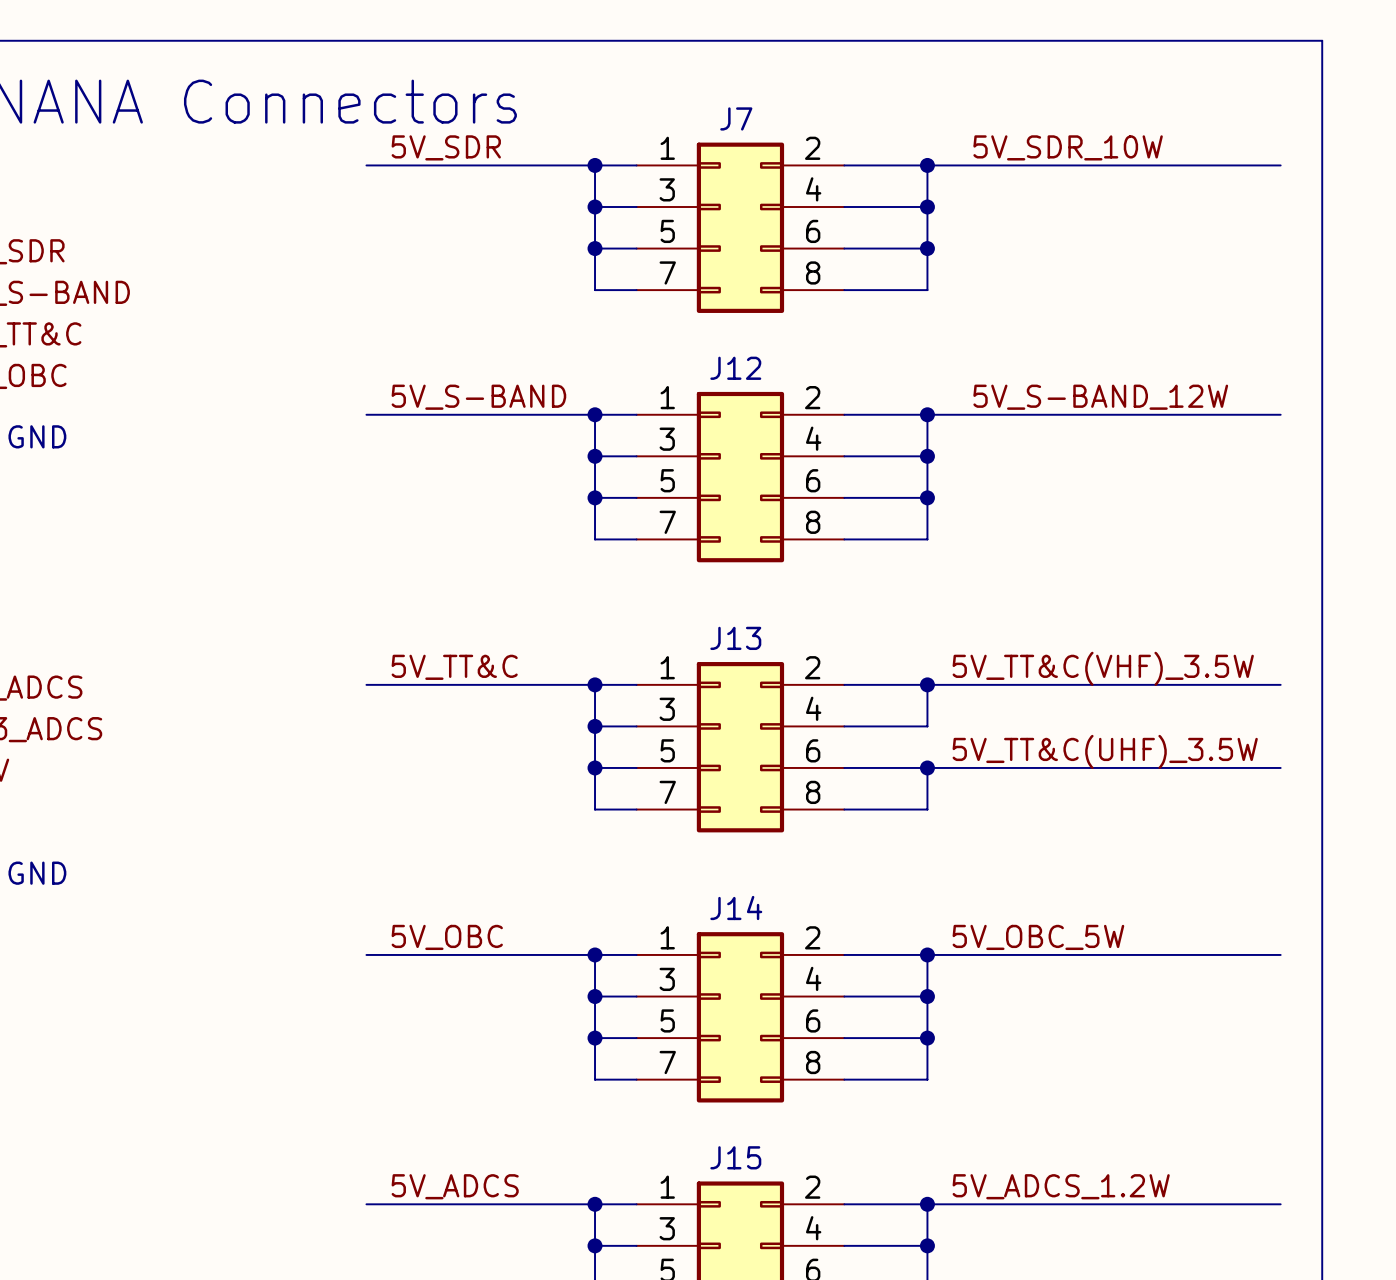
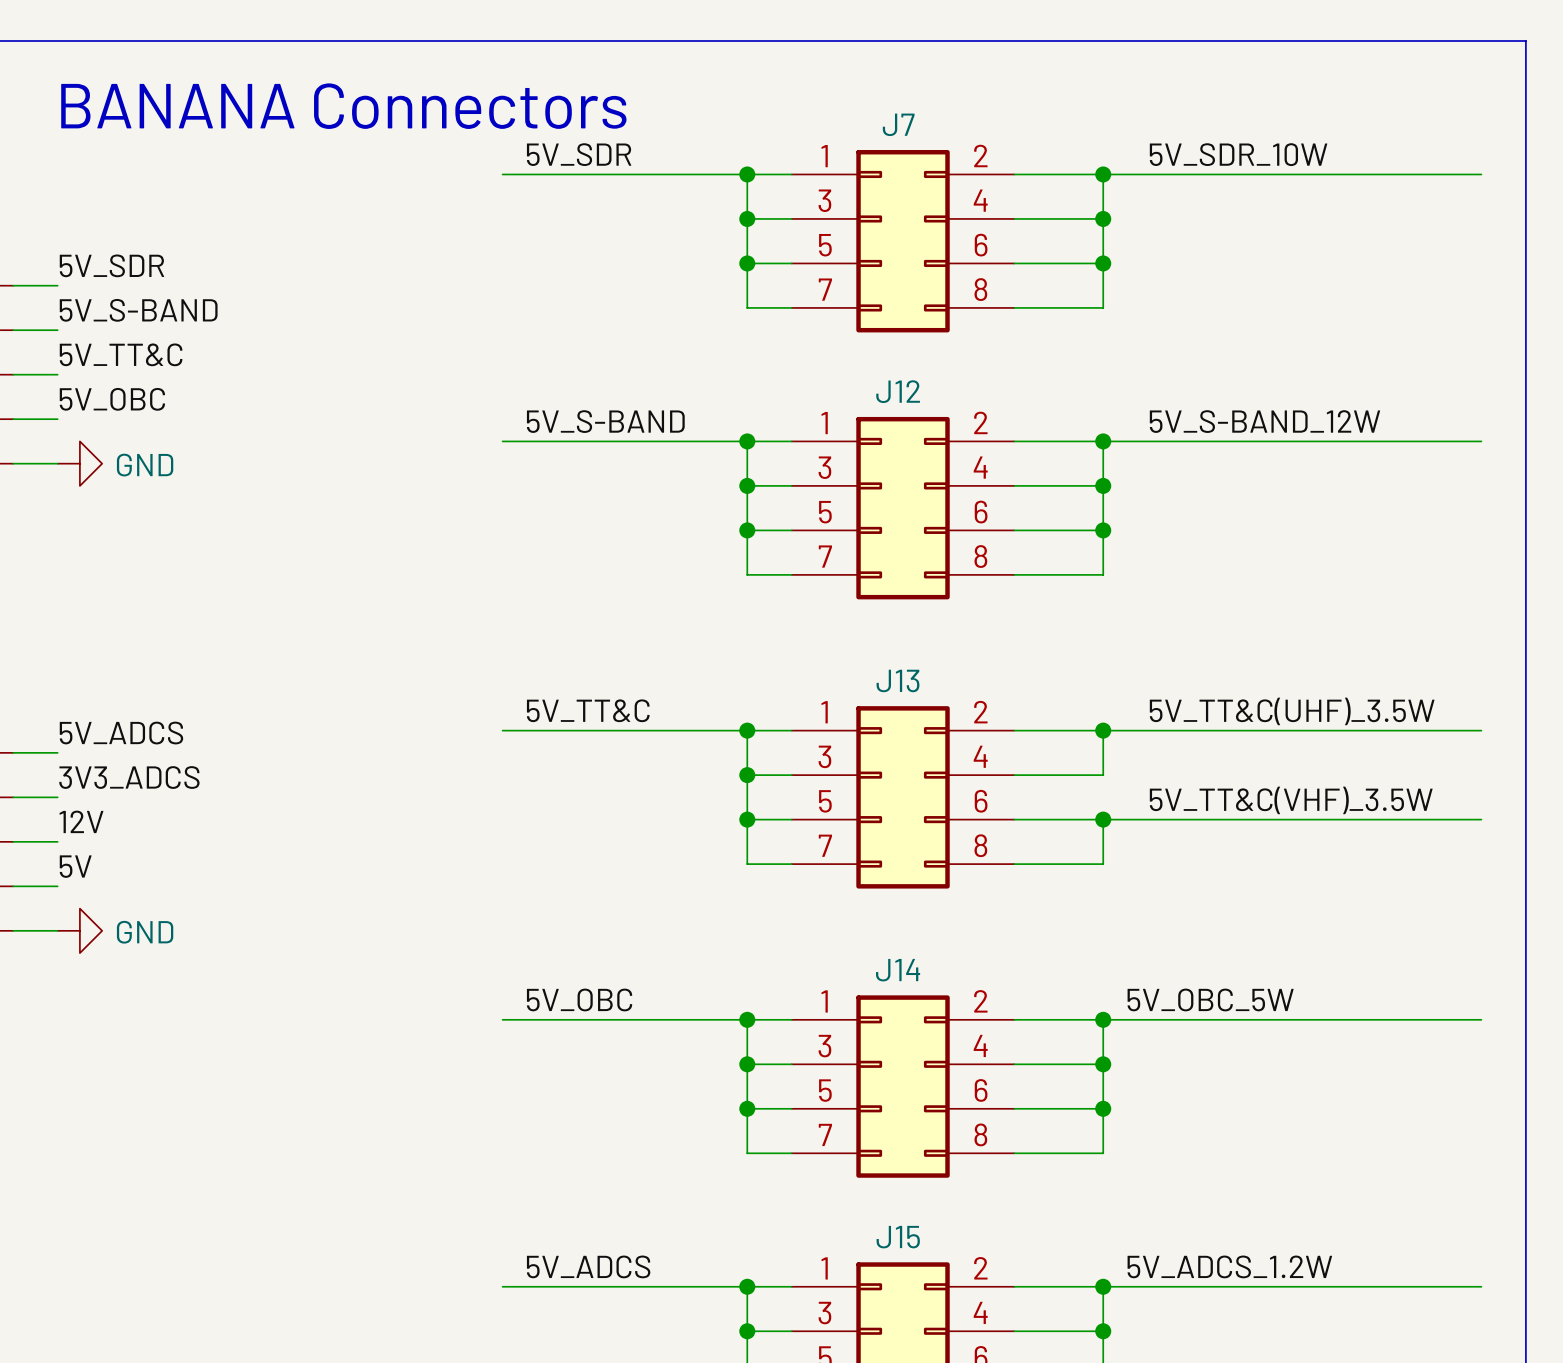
label position: 5V_TT&C(VHF)_3.5W (1103, 668) -> 5V_TT&C(VHF)_3.5W (1291, 800)
label position: 5V_TT&C(UHF)_3.5W (1105, 751) -> 5V_TT&C(UHF)_3.5W (1292, 711)

